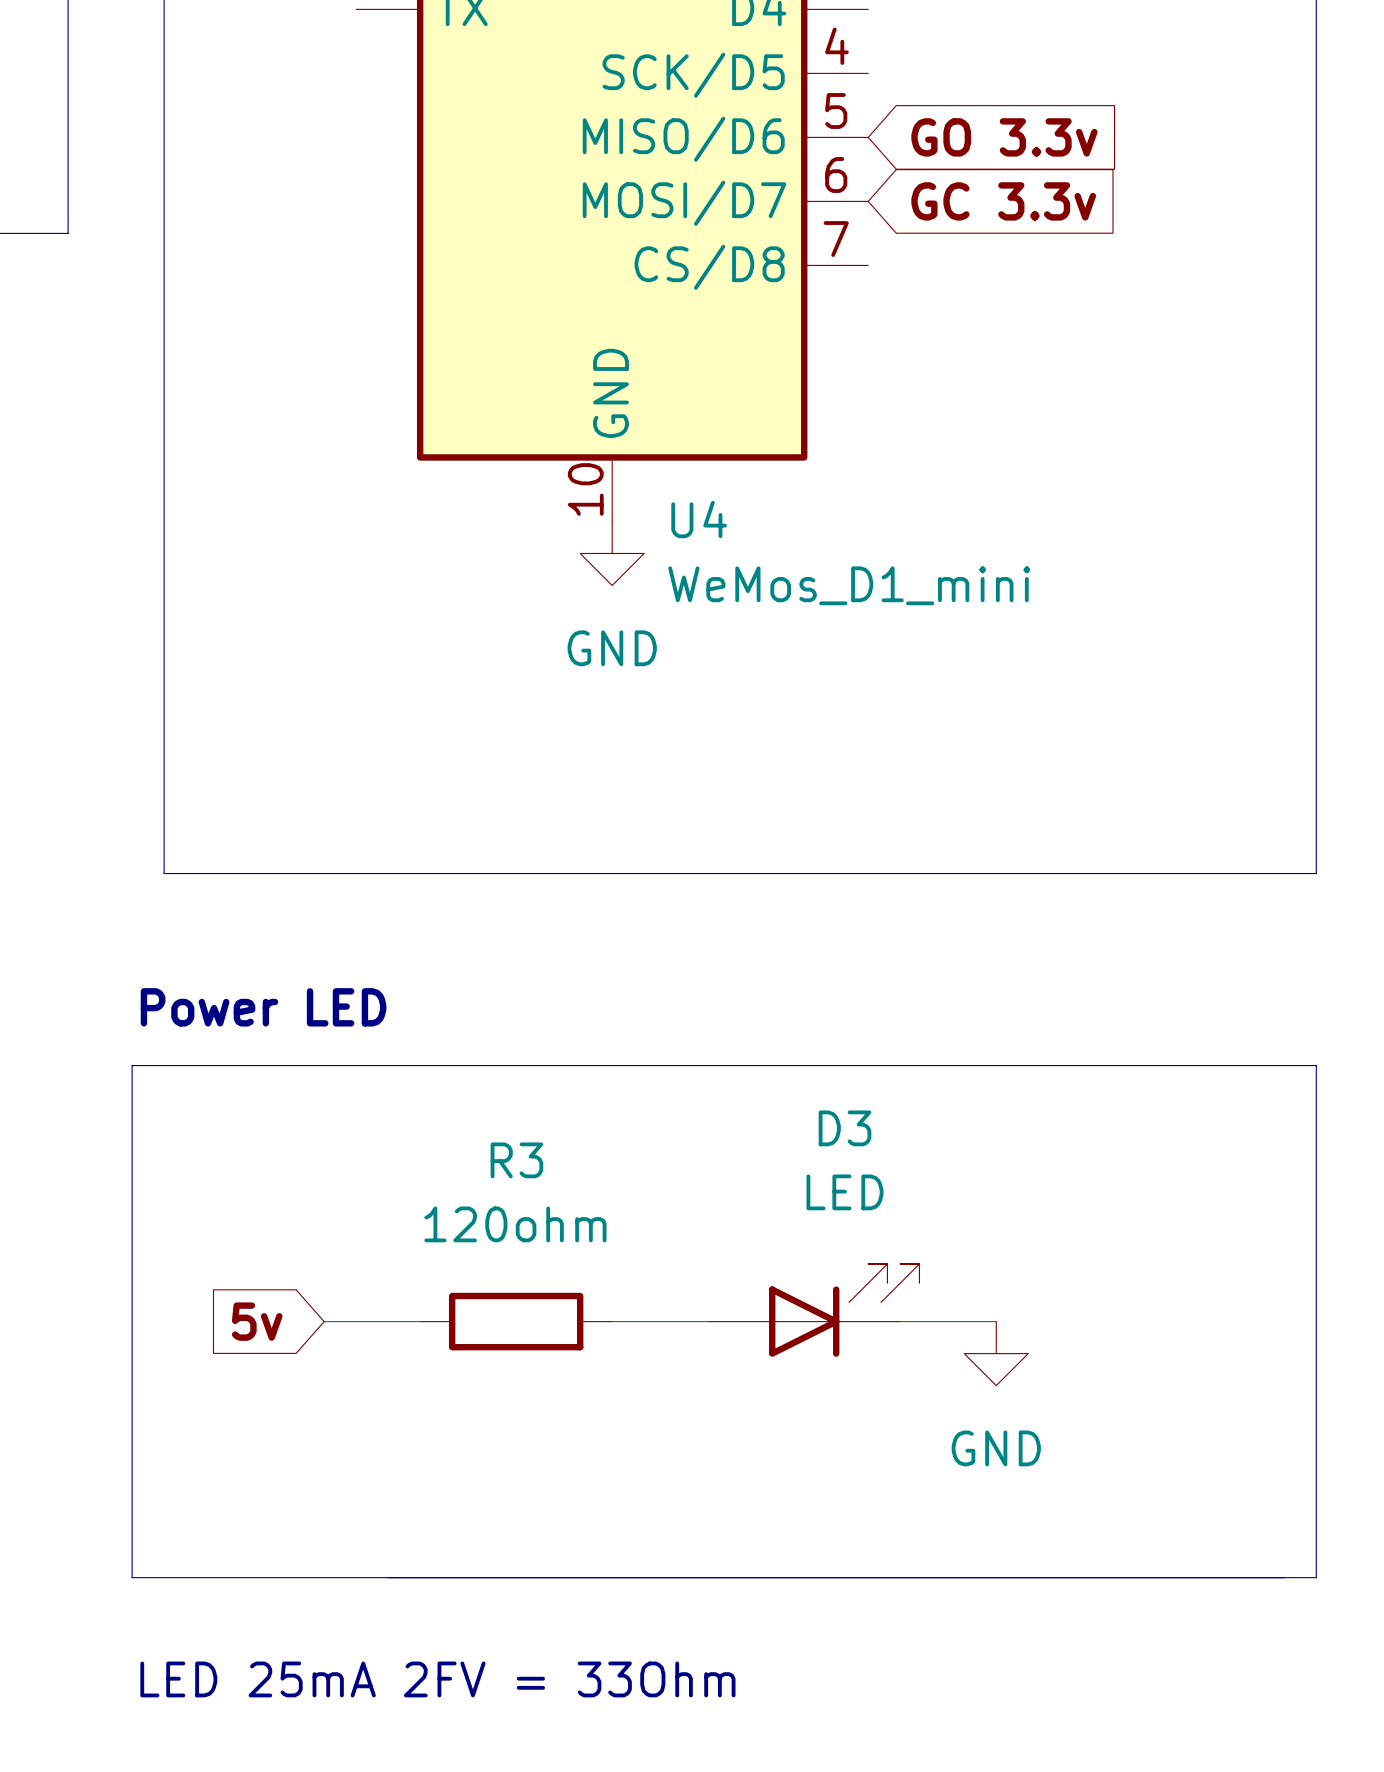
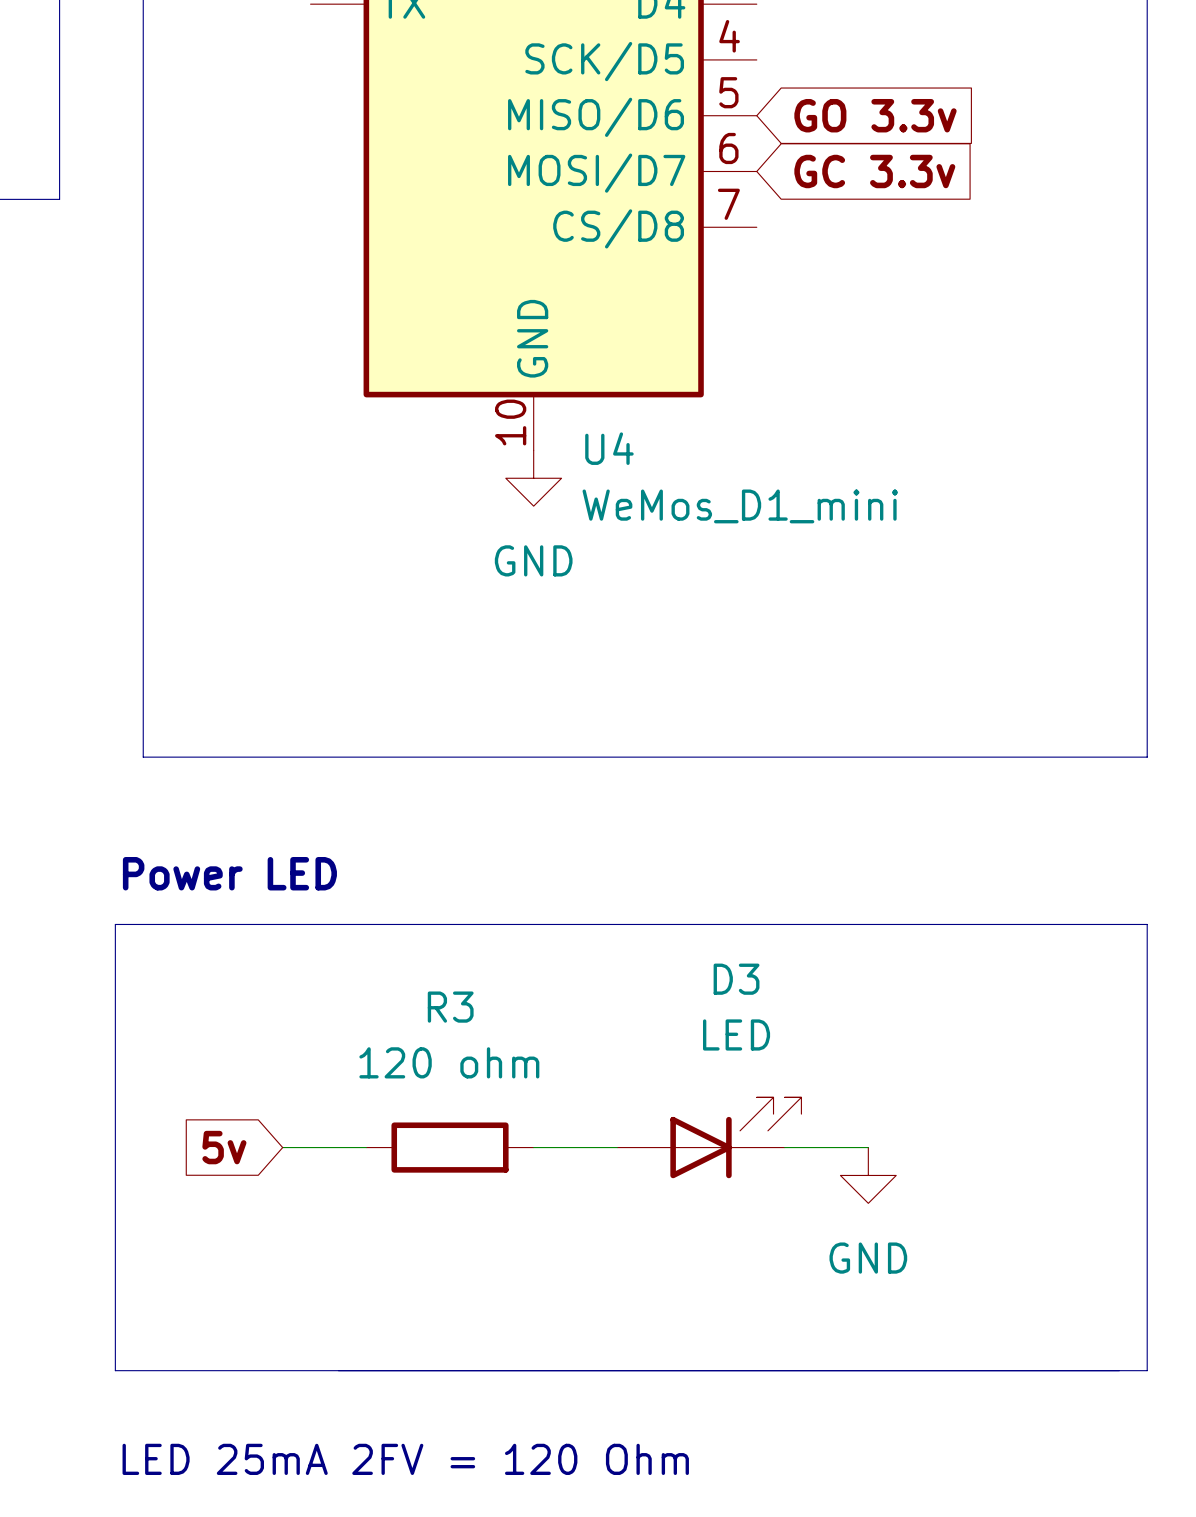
R3 value: 120ohm (515, 1224) -> 120 ohm (449, 1062)
text: LED 25mA 2FV = 33Ohm (437, 1679) -> LED 25mA 2FV = 120 Ohm (405, 1459)

